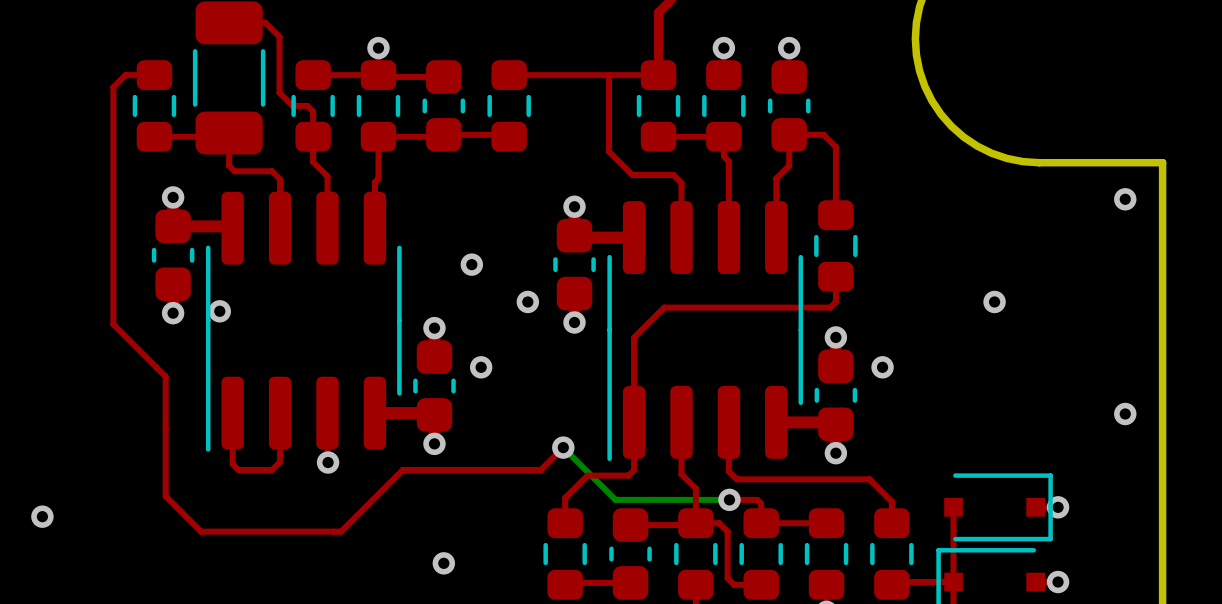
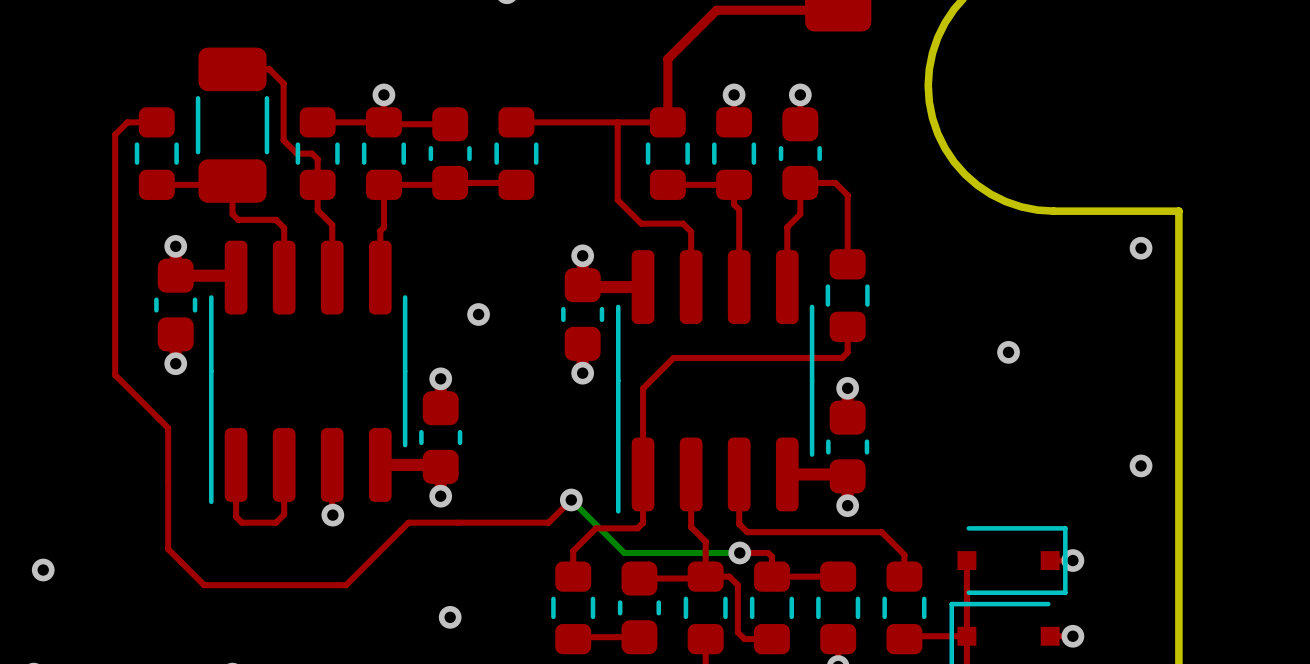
via: (527, 301) -> none
via: (219, 311) -> none
via: (481, 367) -> none
via: (882, 367) -> none

